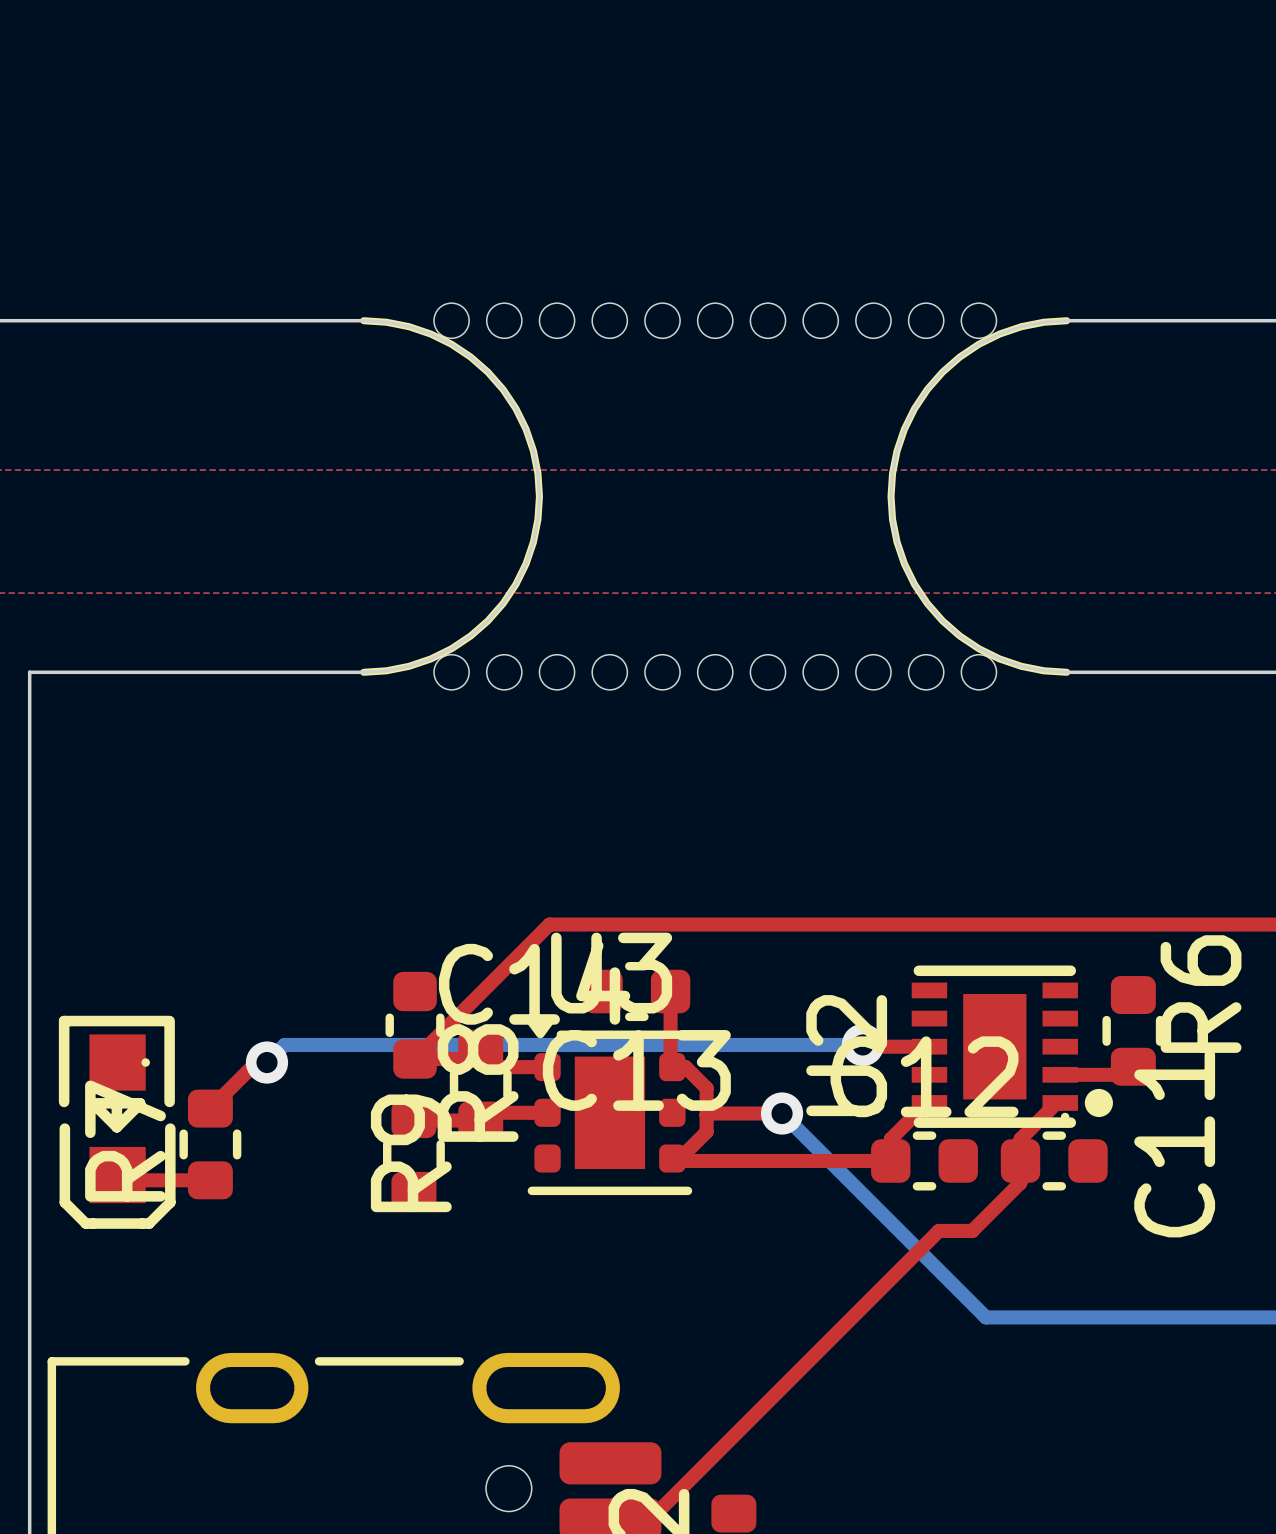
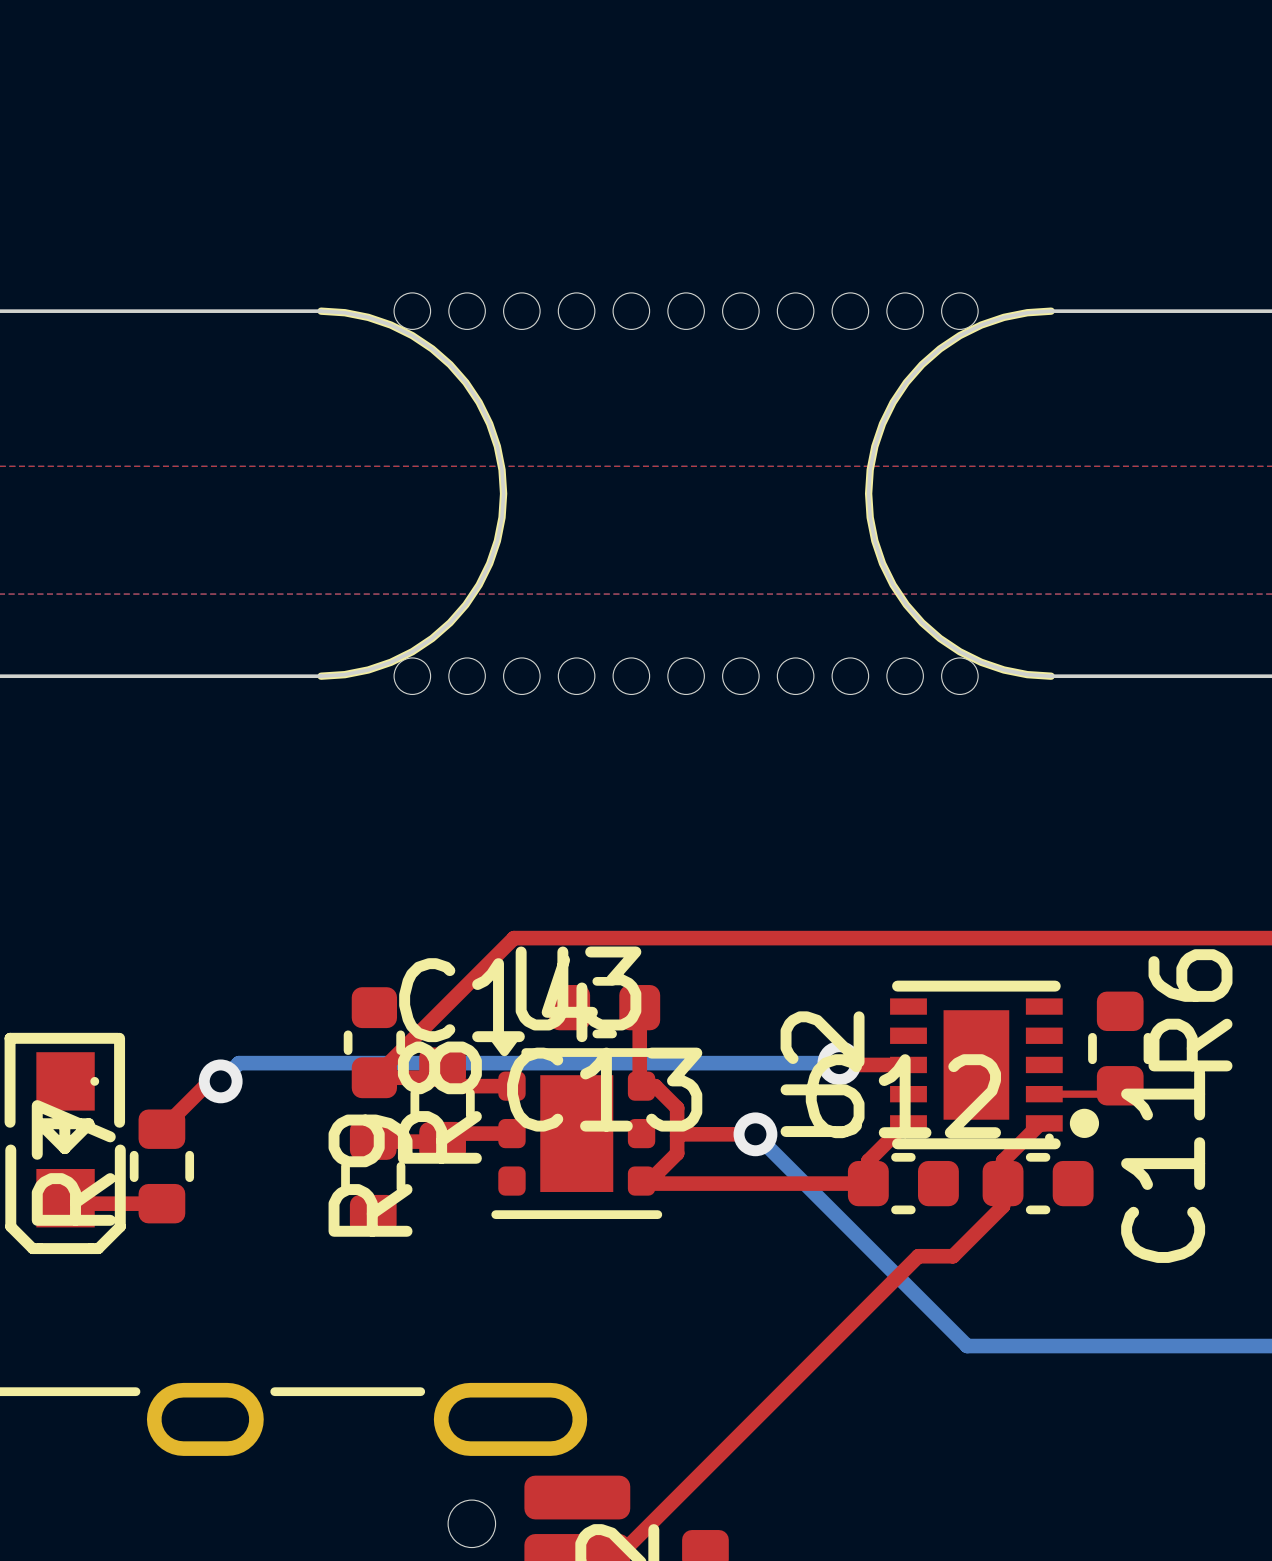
top track width: thick (1060, 1074) (1125, 1074) -> thin (1044, 1094) (1111, 1094)

